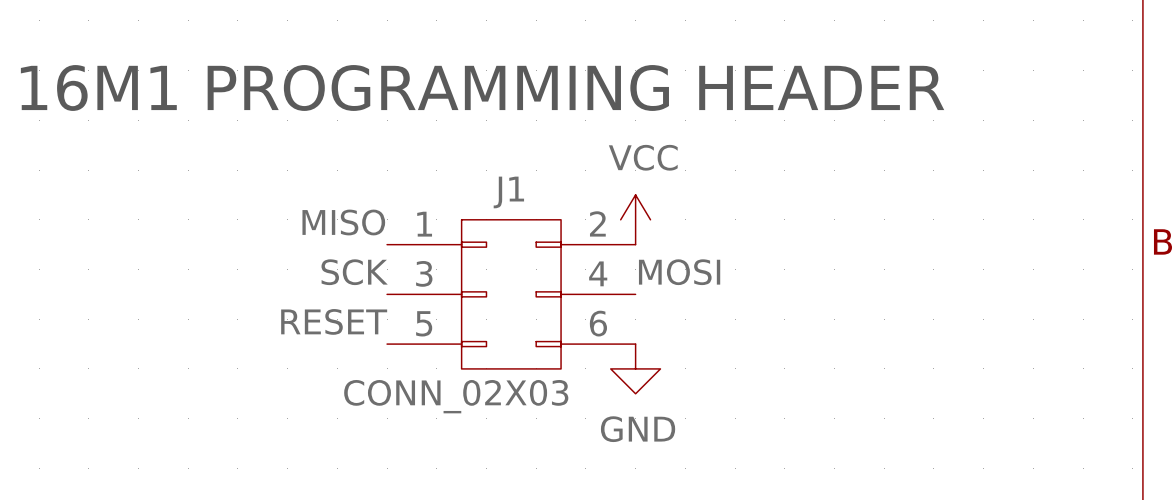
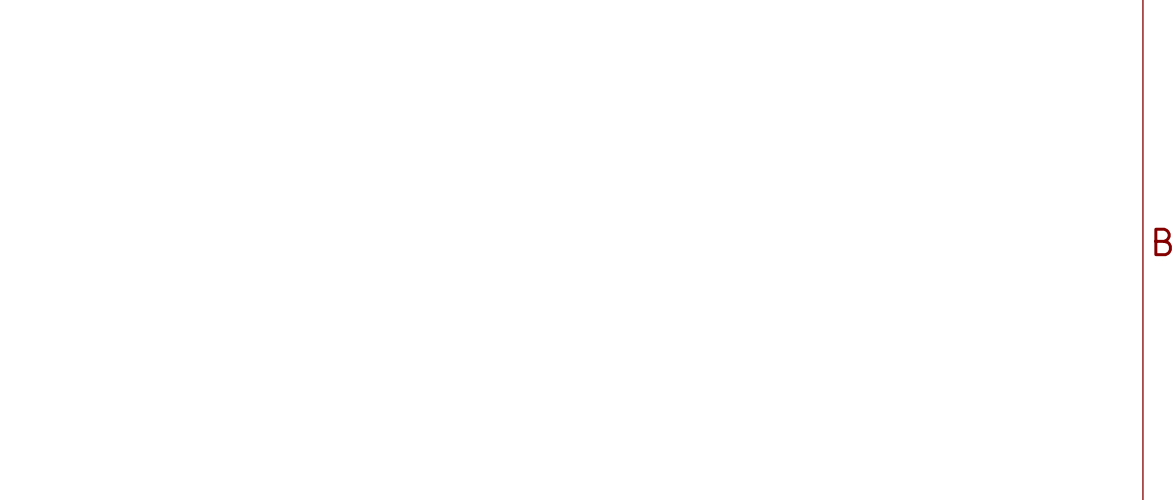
text: 16M1 PROGRAMMING HEADER (482, 87) -> none
power symbol: VCC (635, 219) -> none
label: MISO (343, 222) -> none
label: SCK (354, 272) -> none
label: MOSI (679, 272) -> none
J1: CONN_02X03 (511, 294) -> none
label: RESET (334, 321) -> none
power symbol: GND (635, 368) -> none

